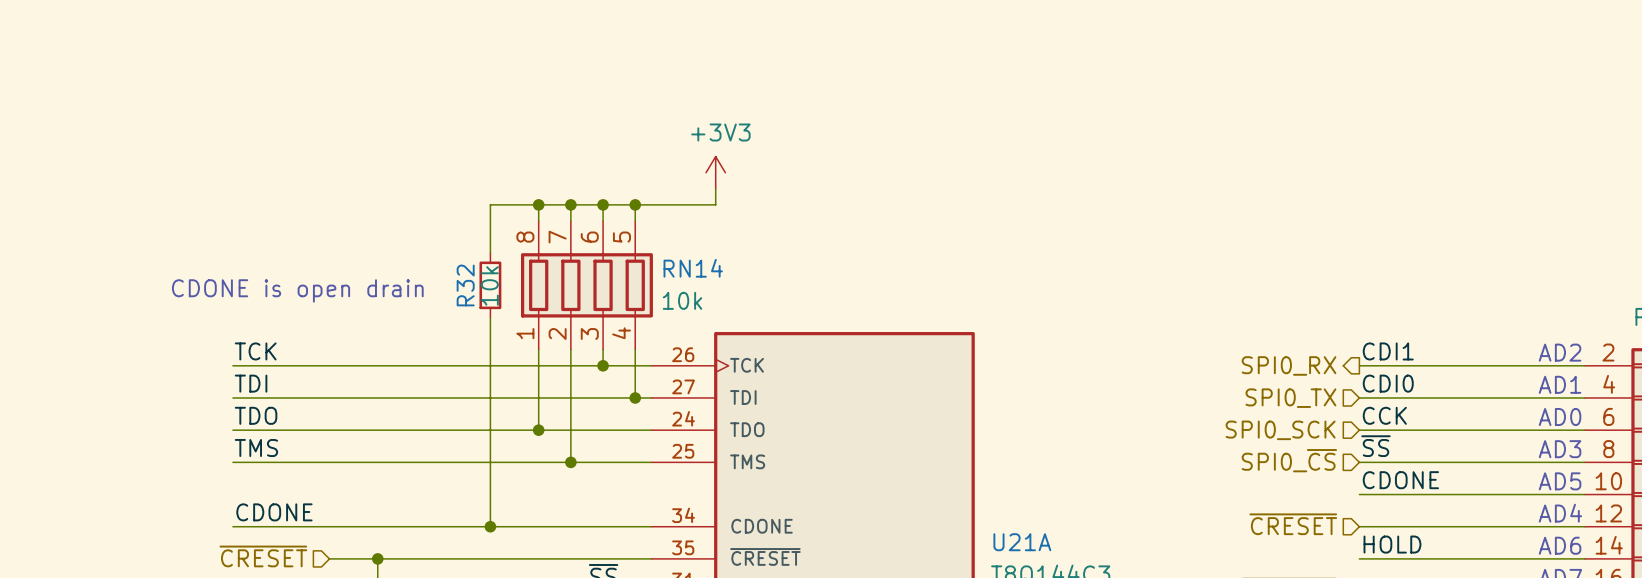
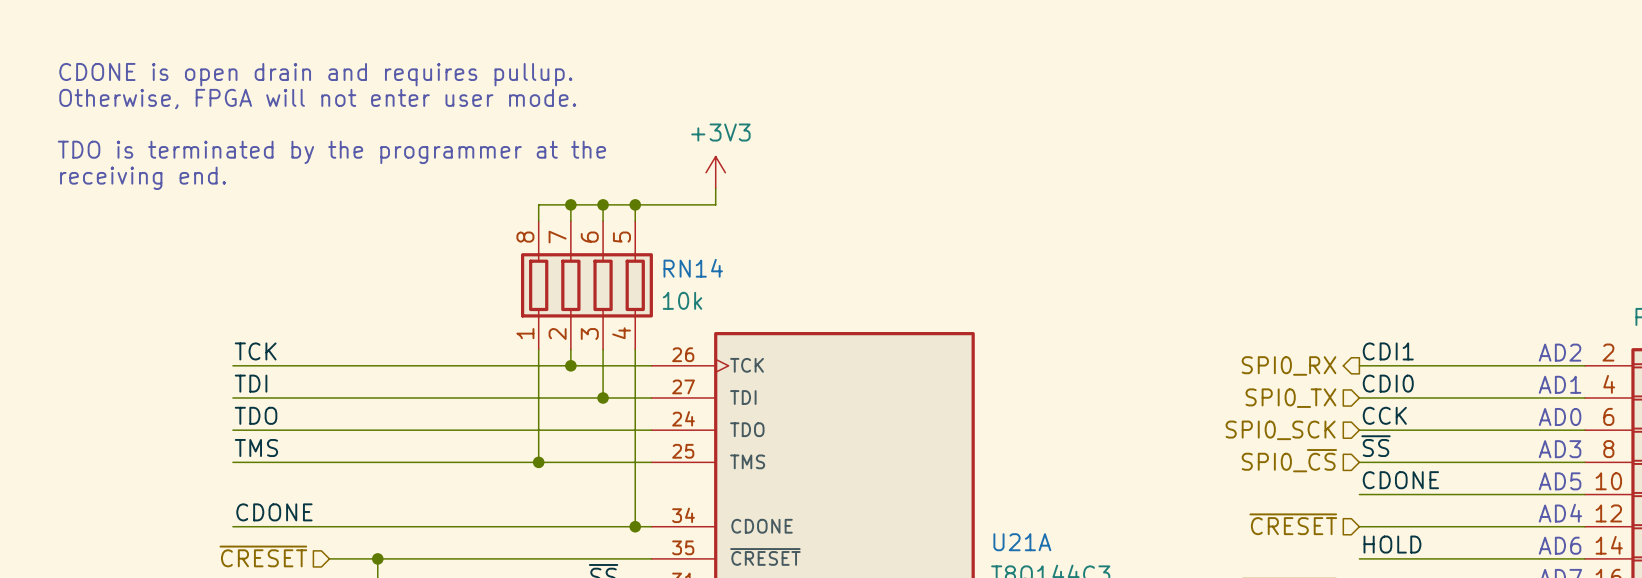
text: none -> CDONE is open drain and requires pullup. (315, 74)
text: none -> Otherwise, FPGA will not enter user mode. (317, 99)
text: none -> TDO is terminated by the programmer at the (331, 152)
text: none -> receiving end. (143, 178)
wire: (538, 204) (490, 204) (490, 253) -> none
junction: (538, 204) -> none
R32: 10k (490, 285) -> none
text: CDONE is open drain (297, 290) -> none
wire: (490, 317) (490, 526) -> none
wire: (570, 365) (570, 462) -> none
junction: none -> (570, 365)
wire: none -> (603, 365) (603, 397)
junction: (603, 365) -> none
junction: none -> (603, 397)
wire: none -> (635, 397) (635, 526)
junction: (635, 397) -> none
wire: none -> (538, 430) (538, 462)
junction: (538, 430) -> none
junction: none -> (538, 462)
junction: (570, 462) -> none
junction: (490, 526) -> none
junction: none -> (635, 526)

